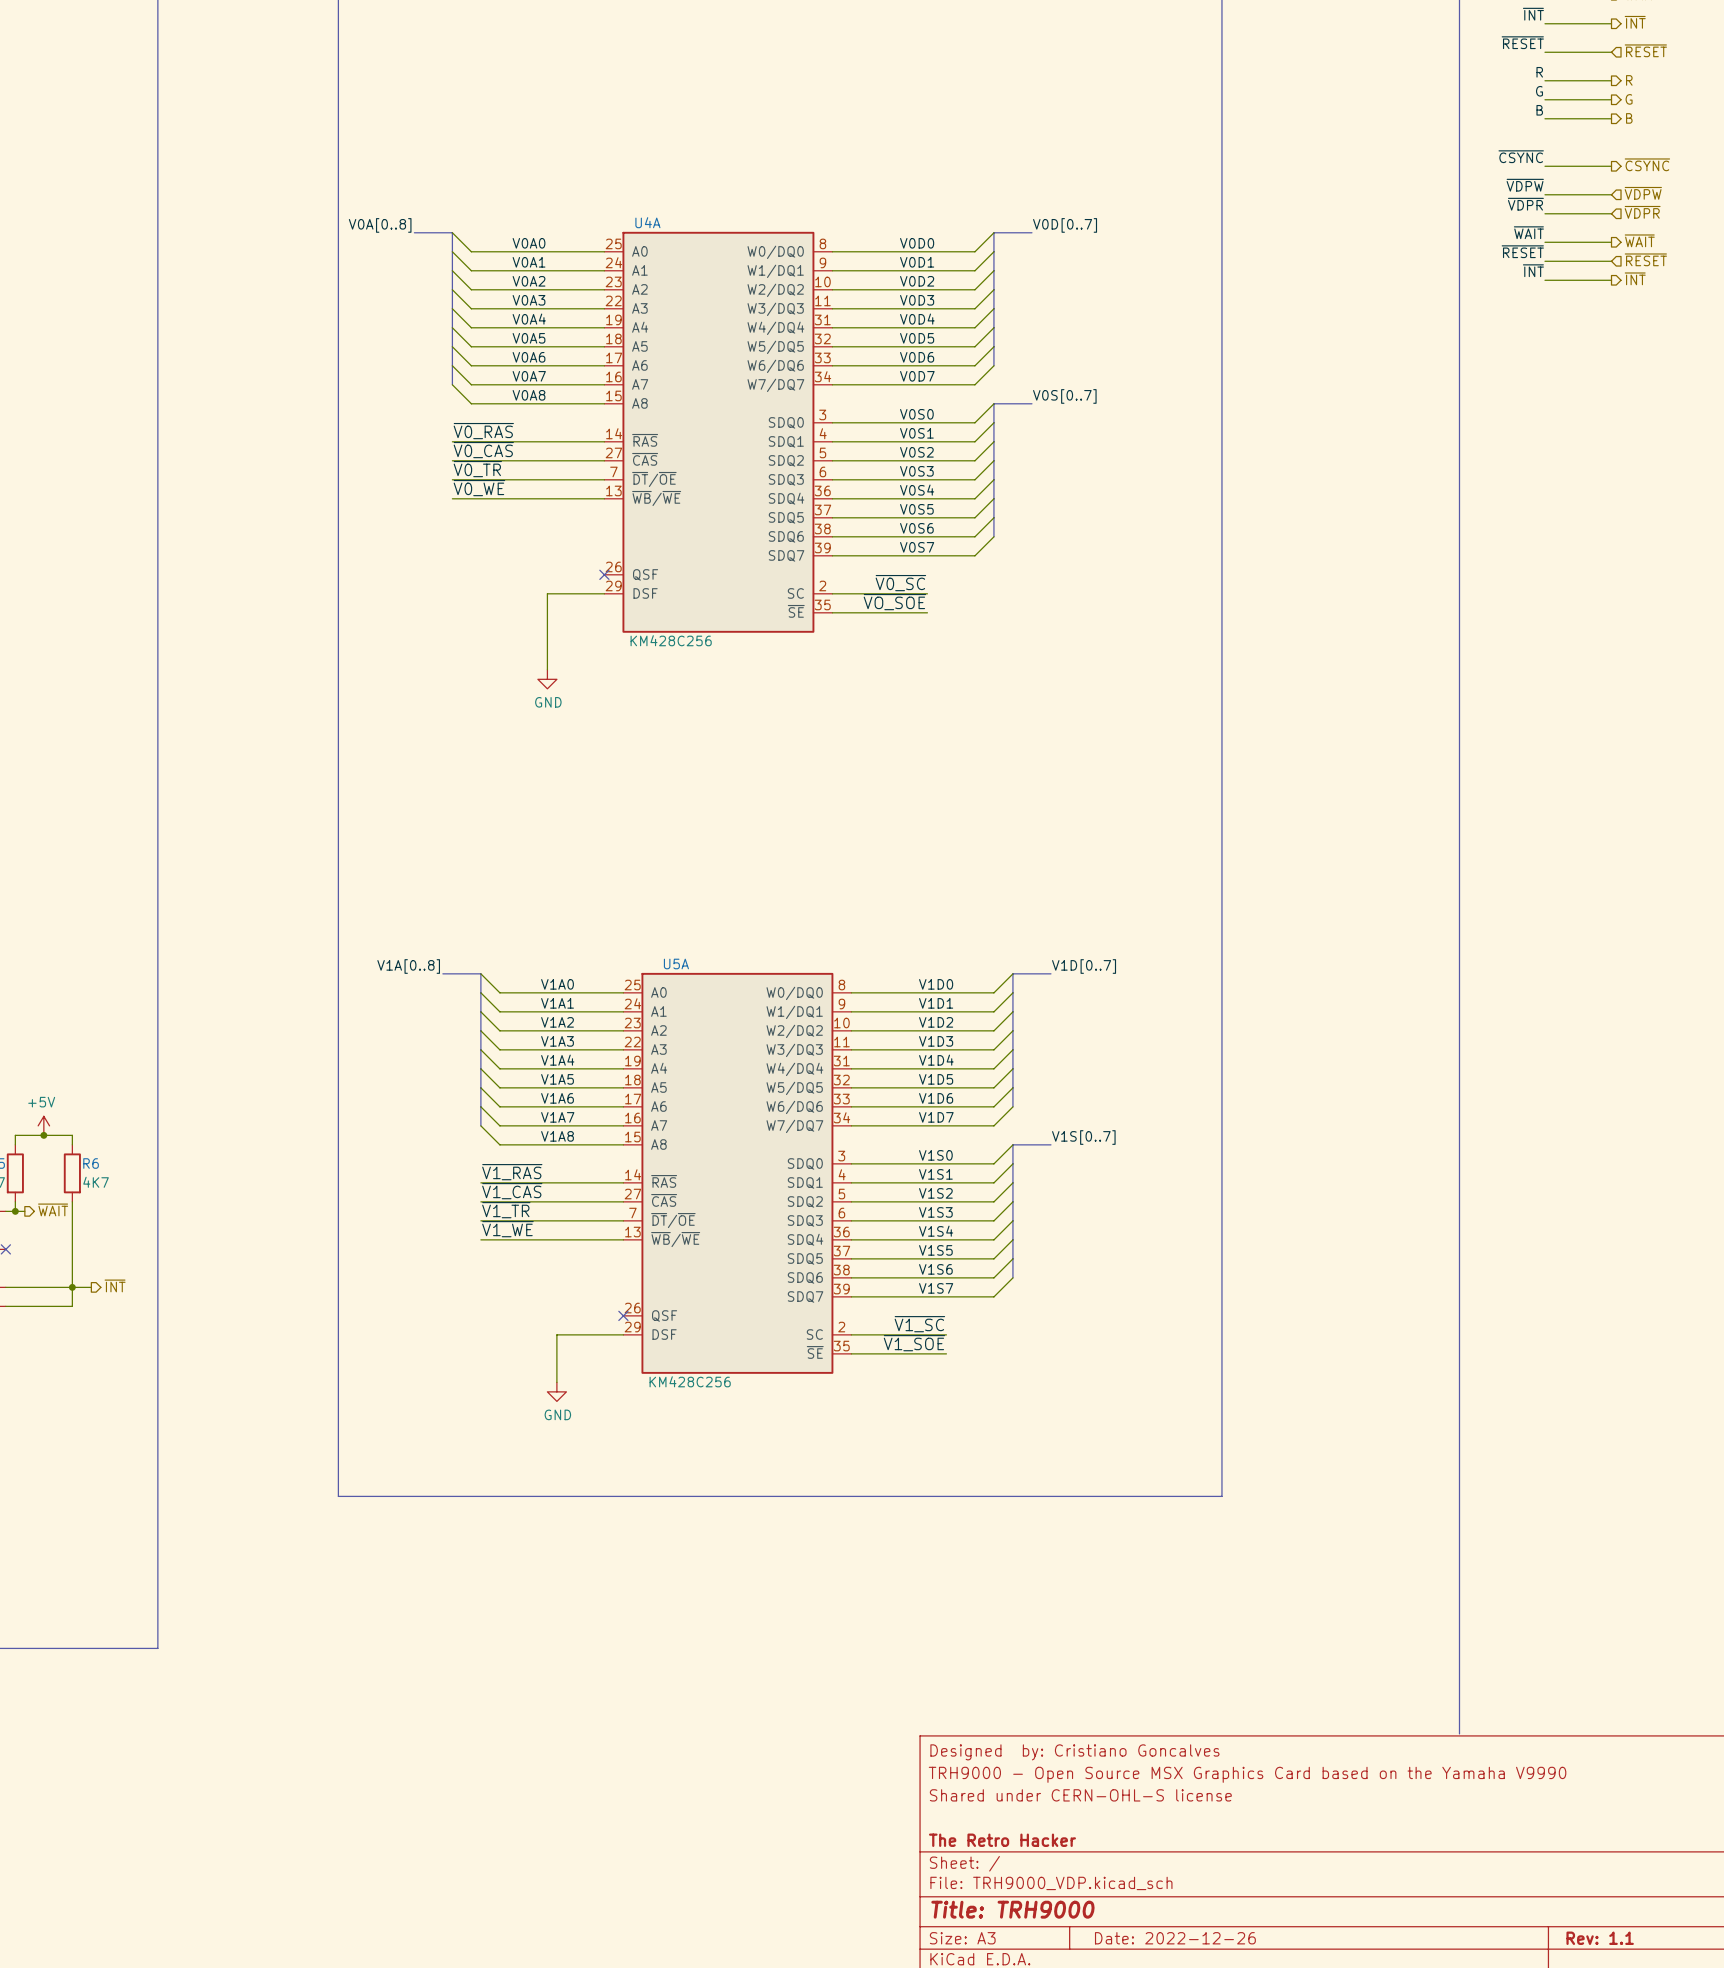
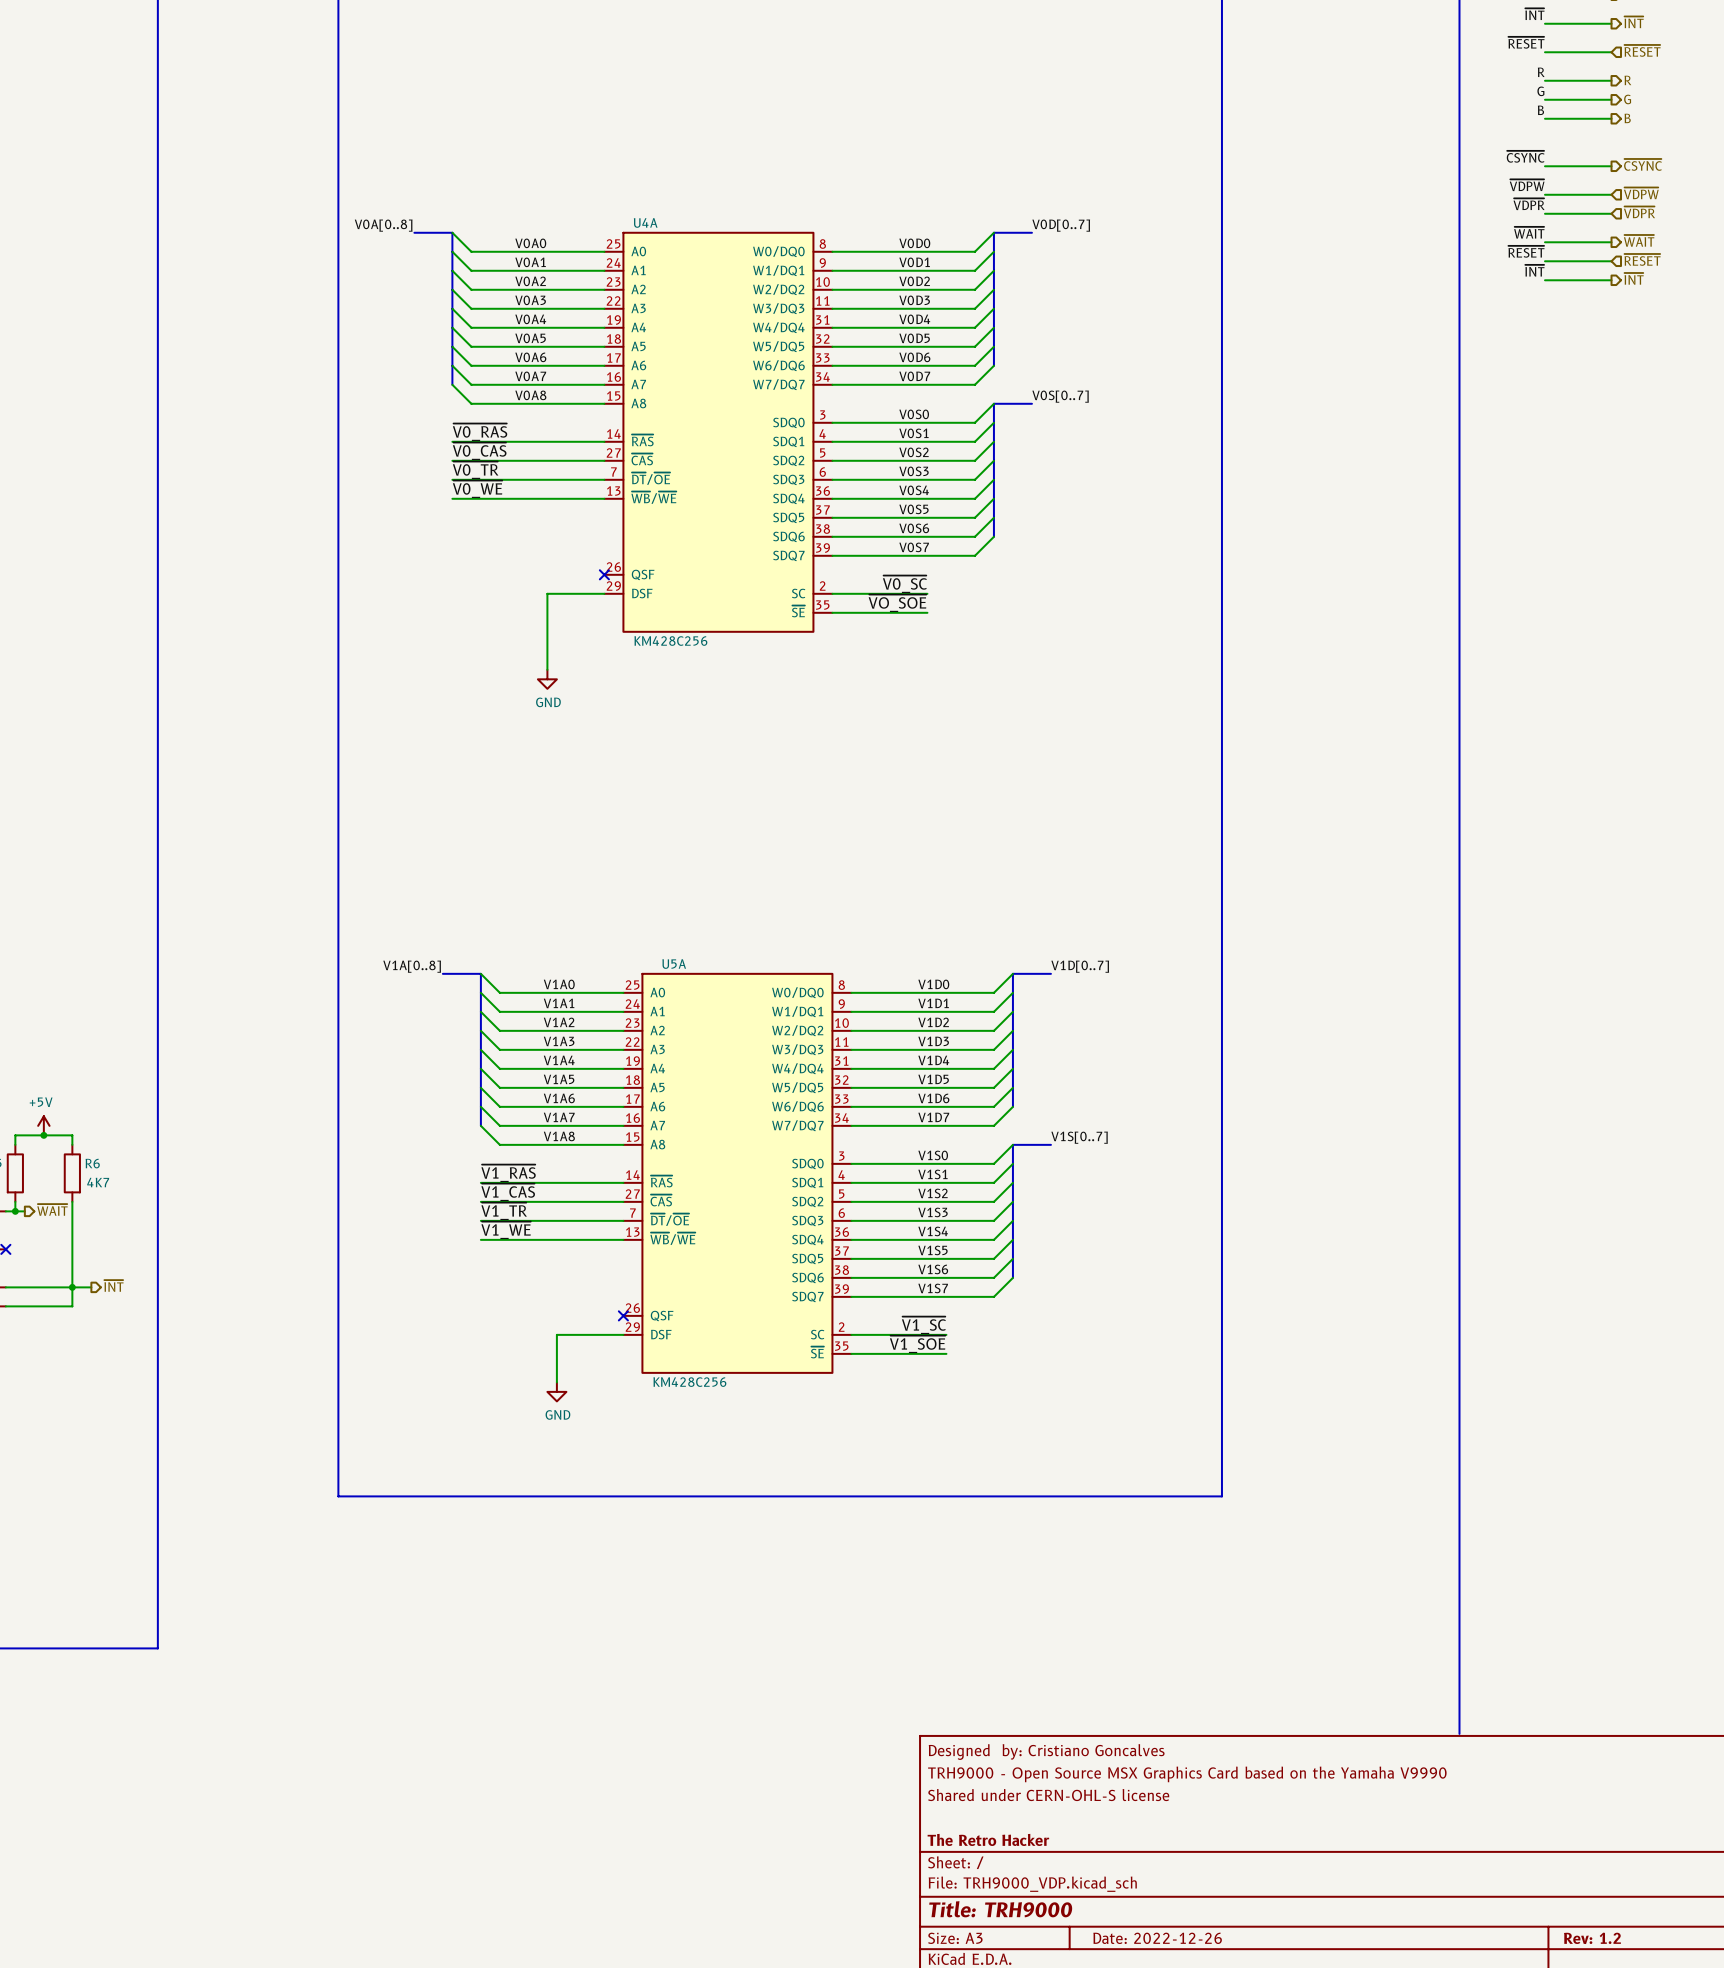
title block: Rev: 1.1 (1600, 1938) -> Rev: 1.2 (1592, 1938)

